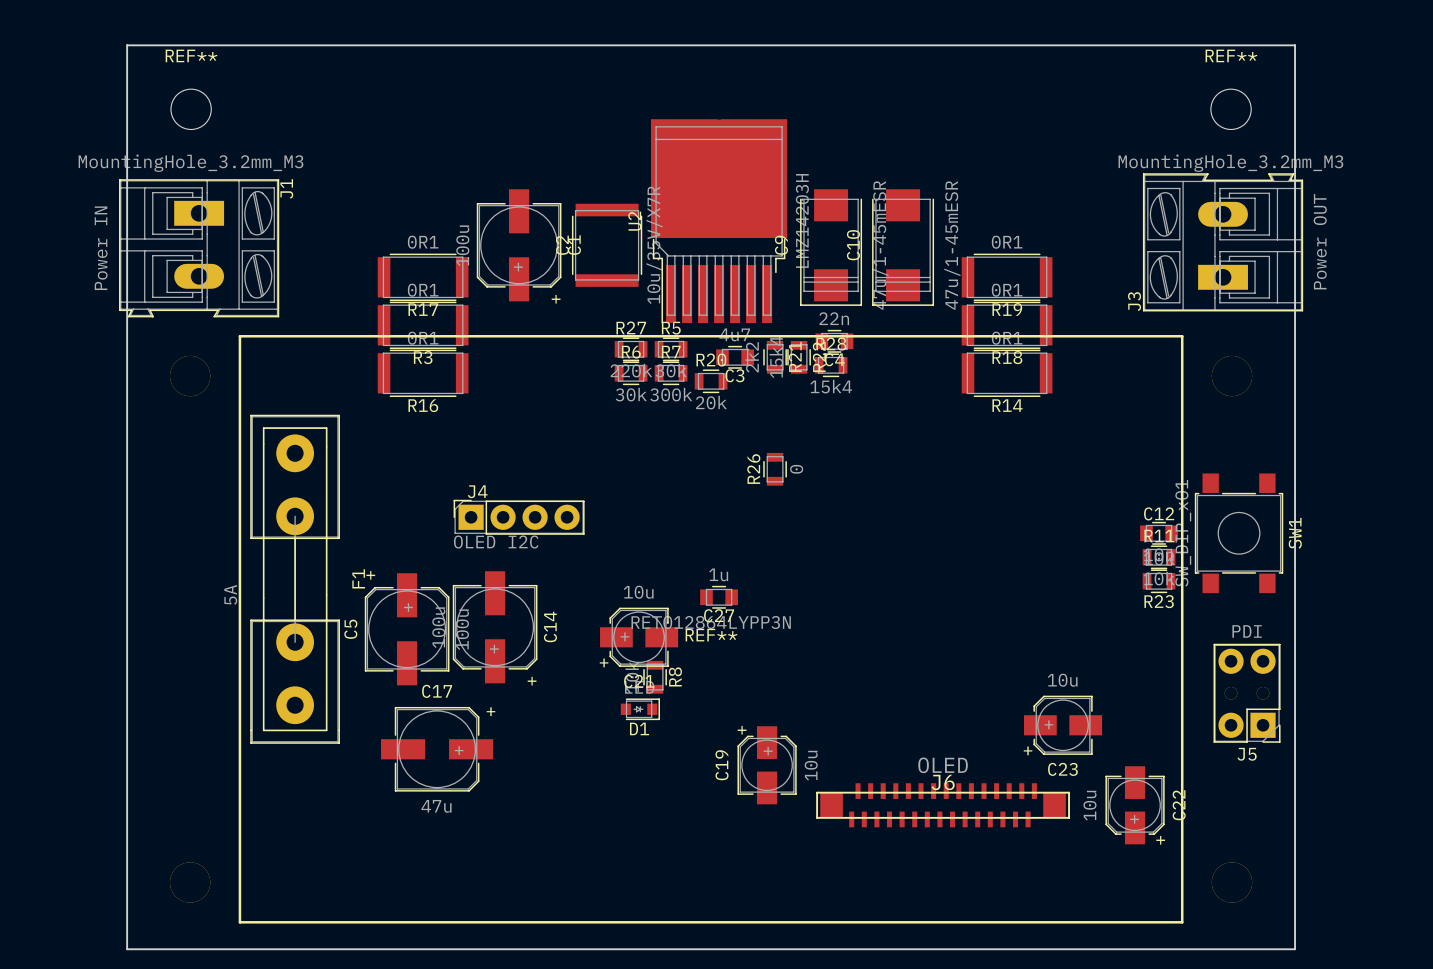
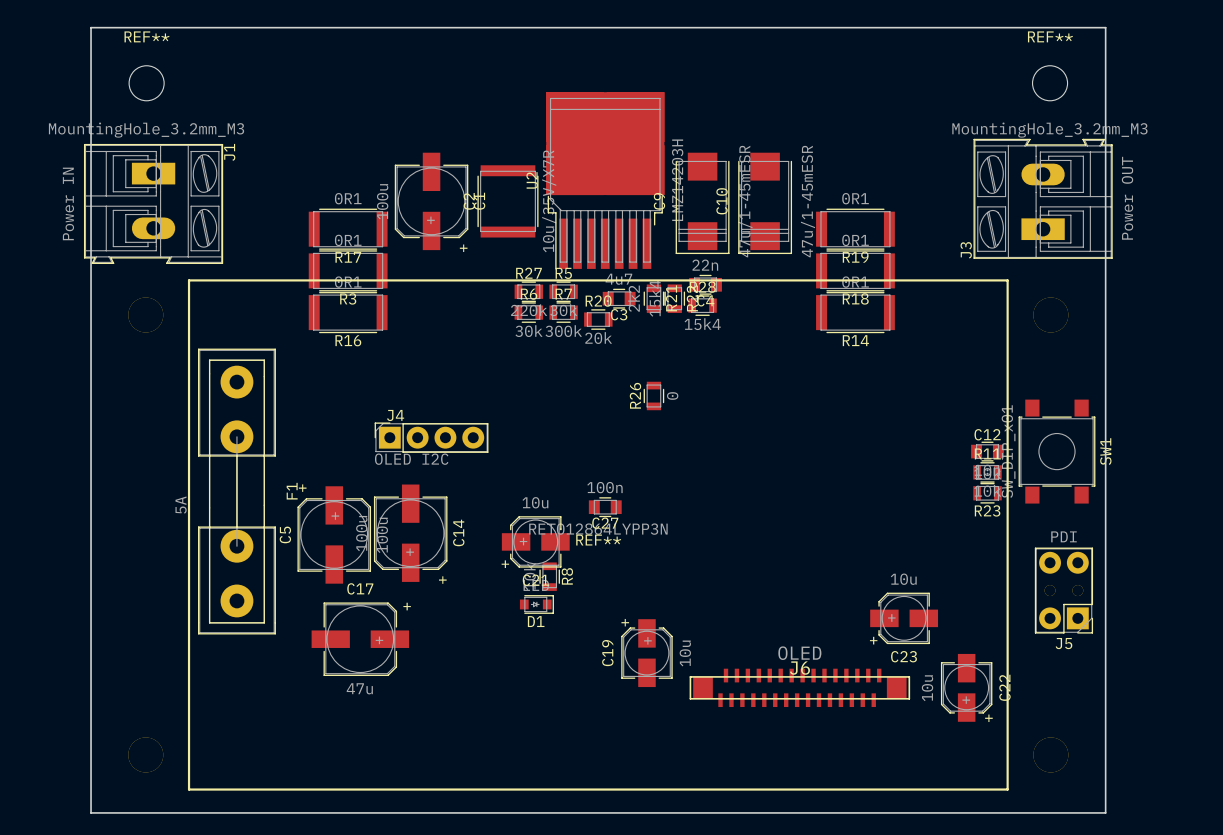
C27 value: 1u (718, 574) -> 100n (604, 487)

